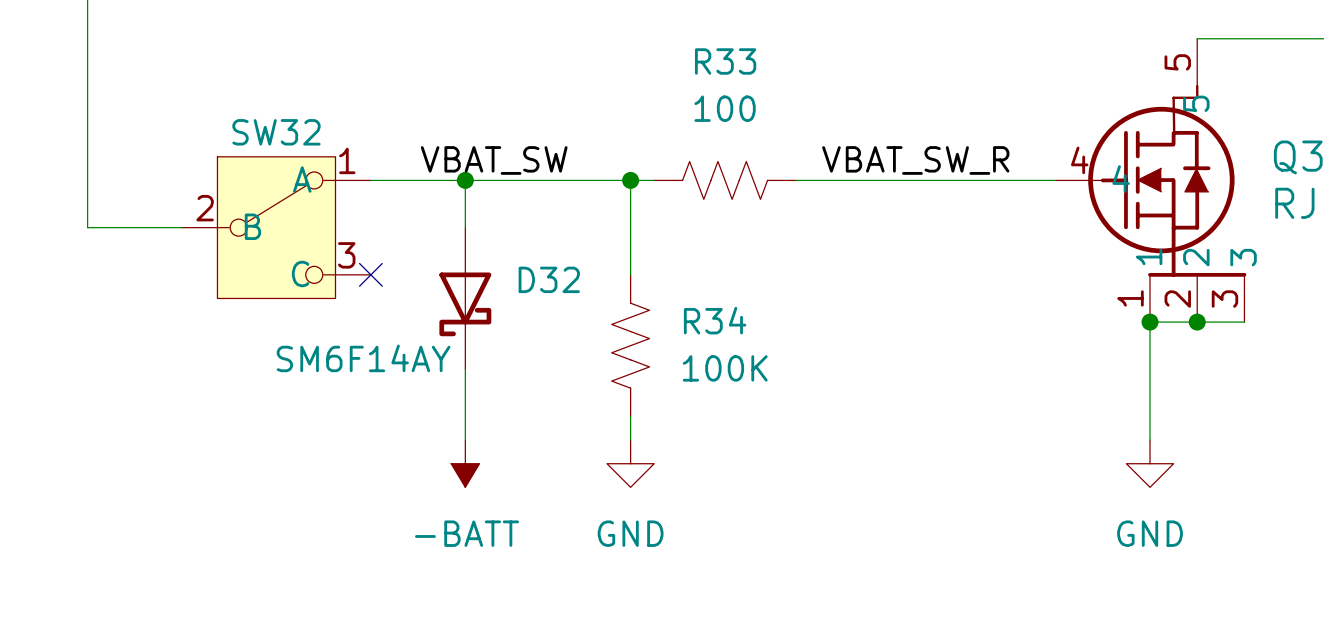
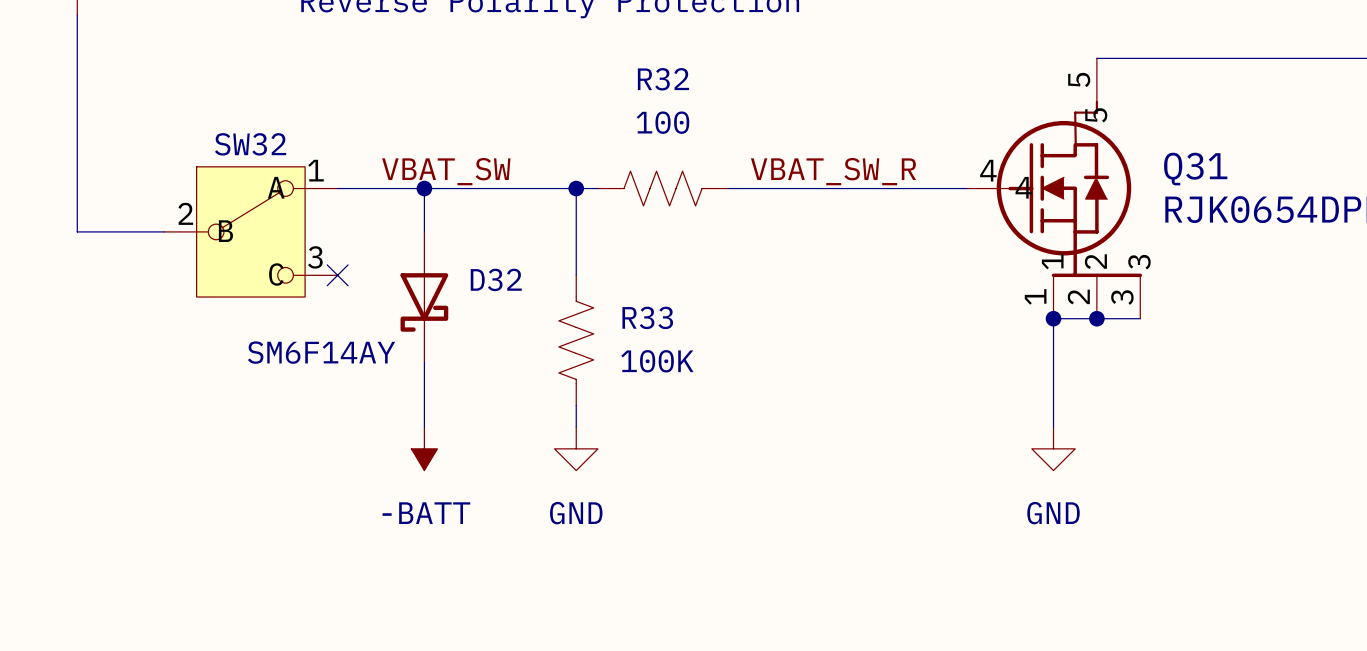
R33 name: R33 (725, 61) -> R32 (663, 79)
R34 name: R34 (715, 320) -> R33 (647, 317)

